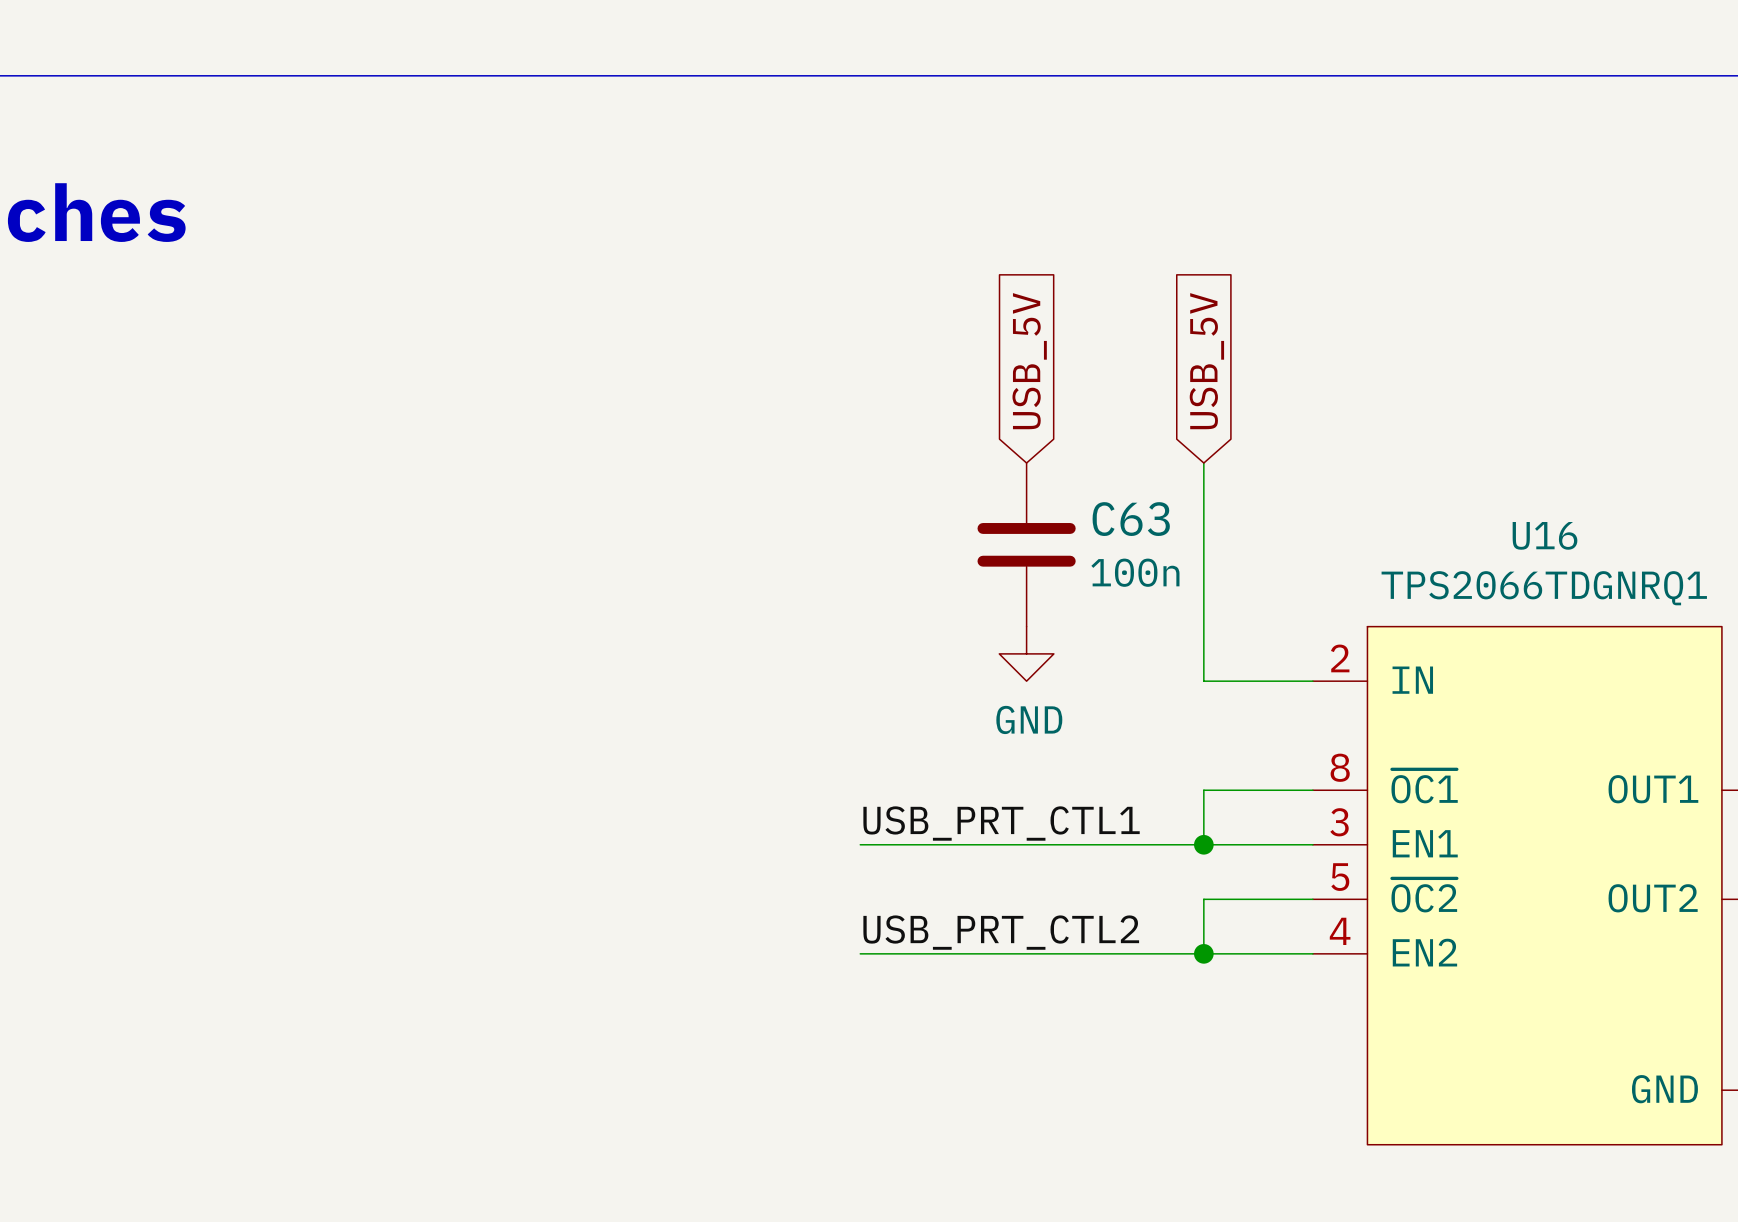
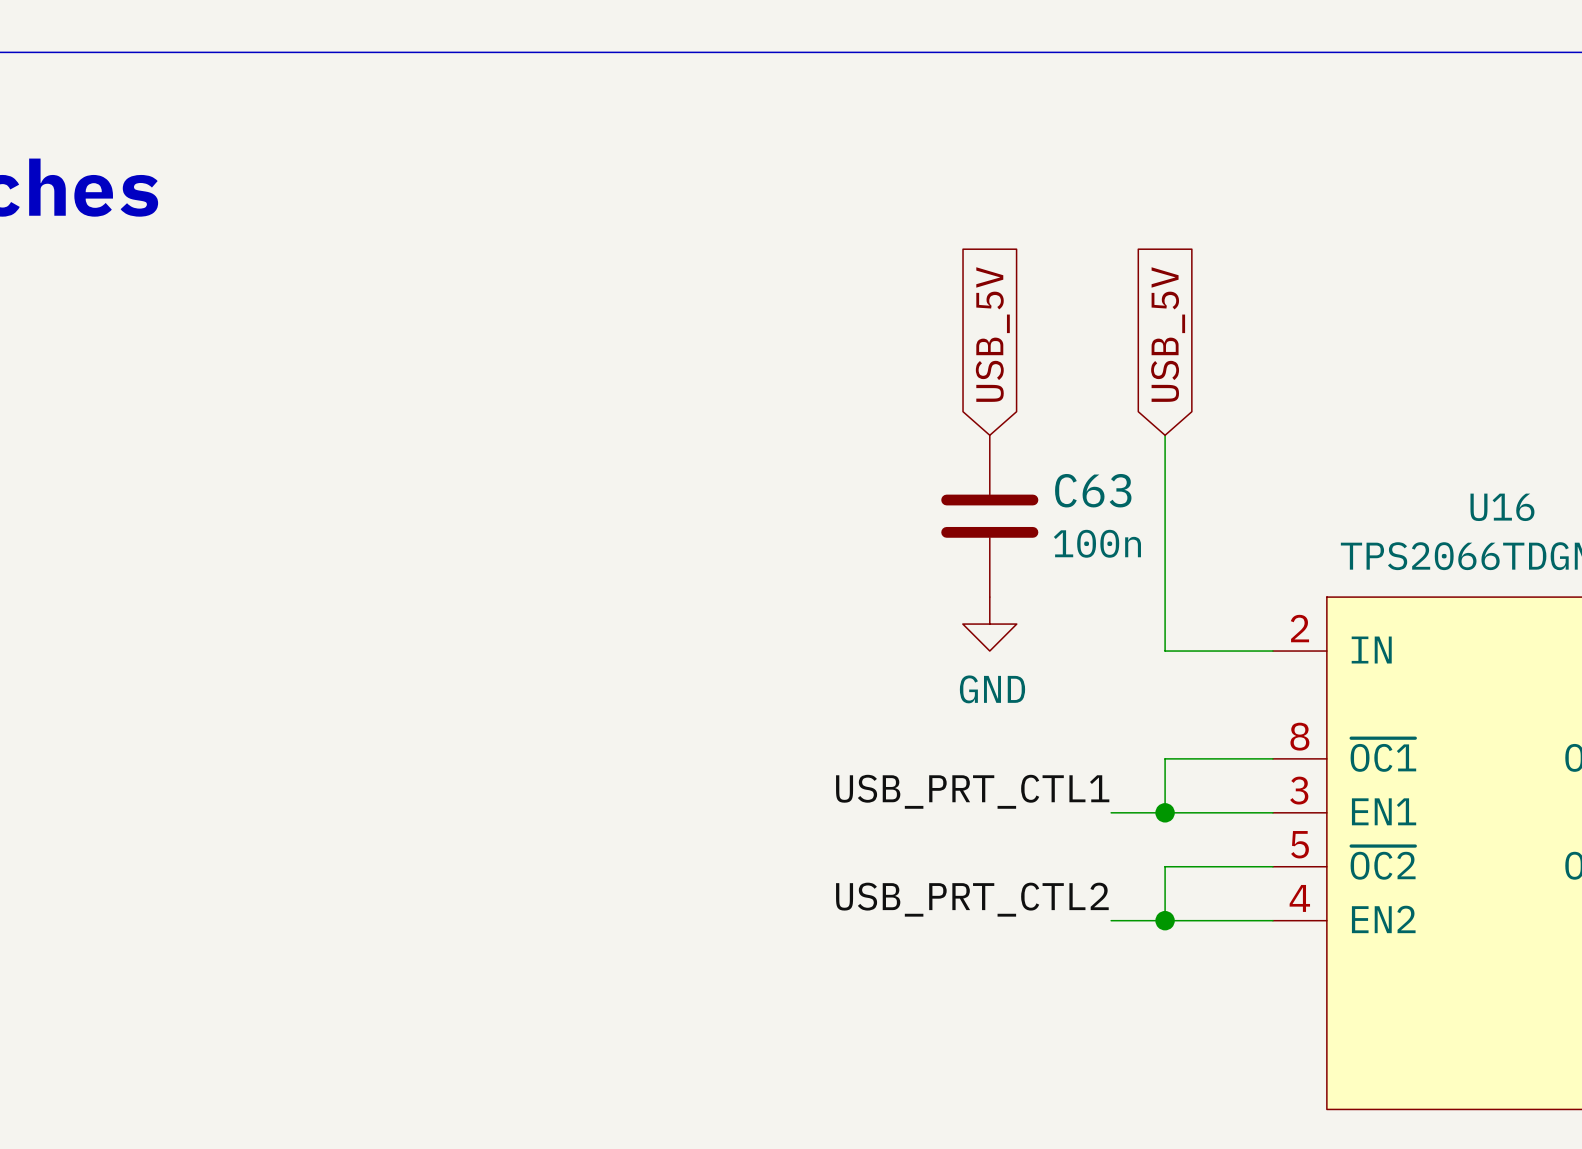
label position: USB_PRT_CTL1 (1001, 823) -> USB_PRT_CTL1 (972, 791)
wire: (860, 844) (1149, 844) -> none
label position: USB_PRT_CTL2 (1001, 932) -> USB_PRT_CTL2 (972, 899)
wire: (860, 953) (1149, 953) -> none

